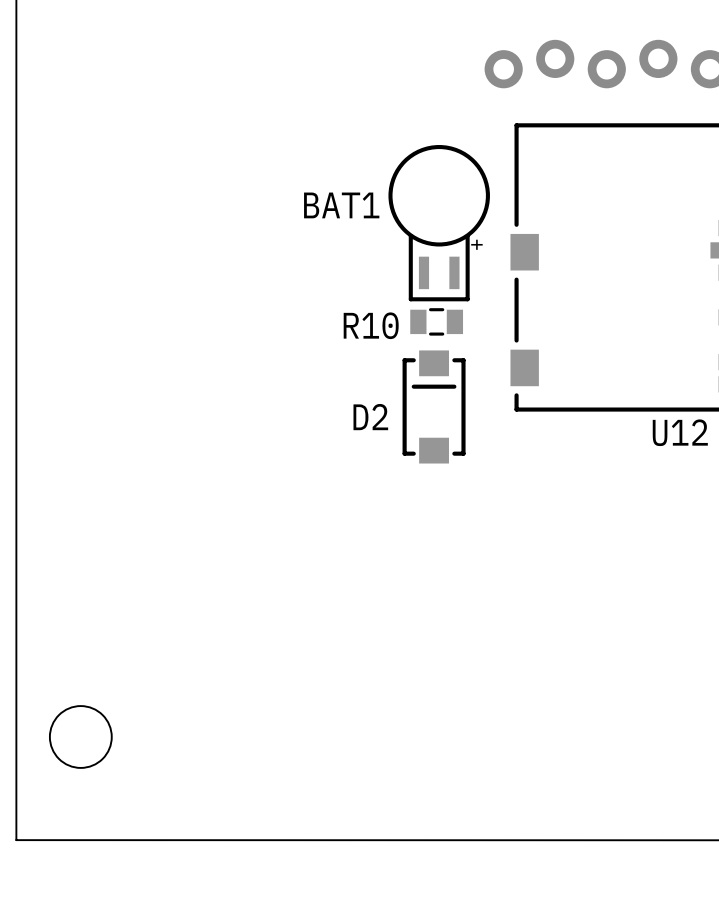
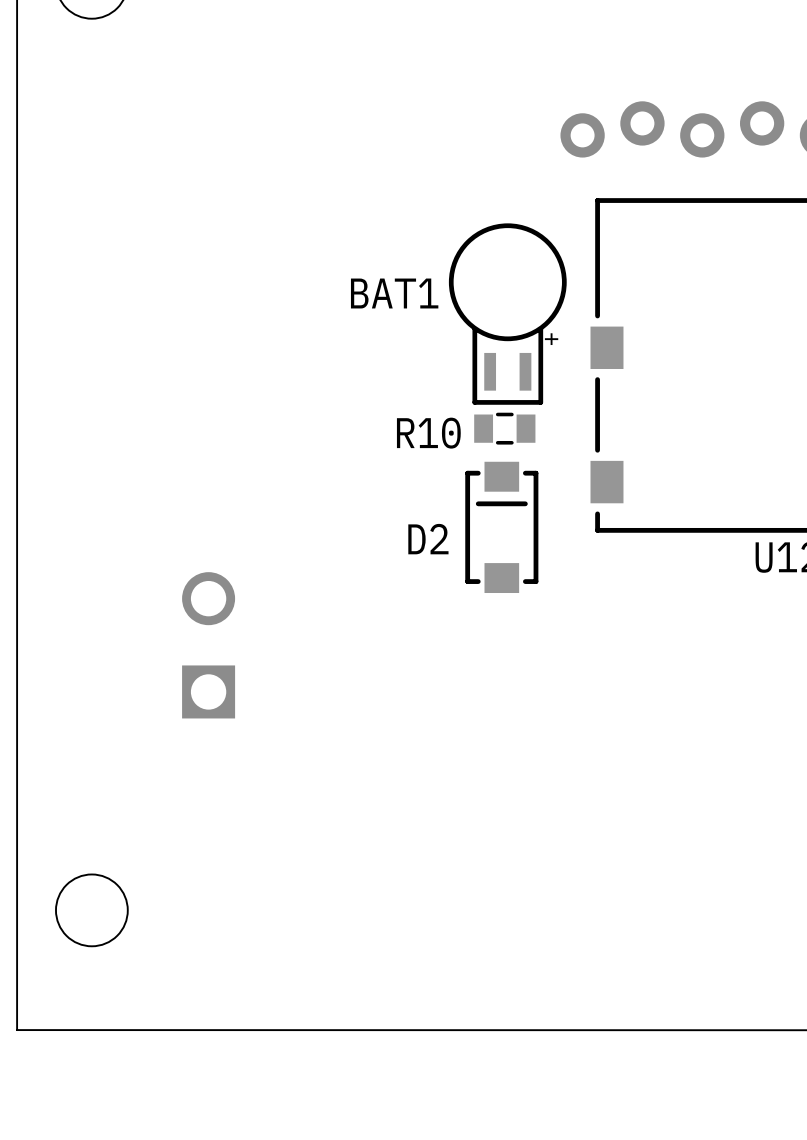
part: none -> (208, 645)

